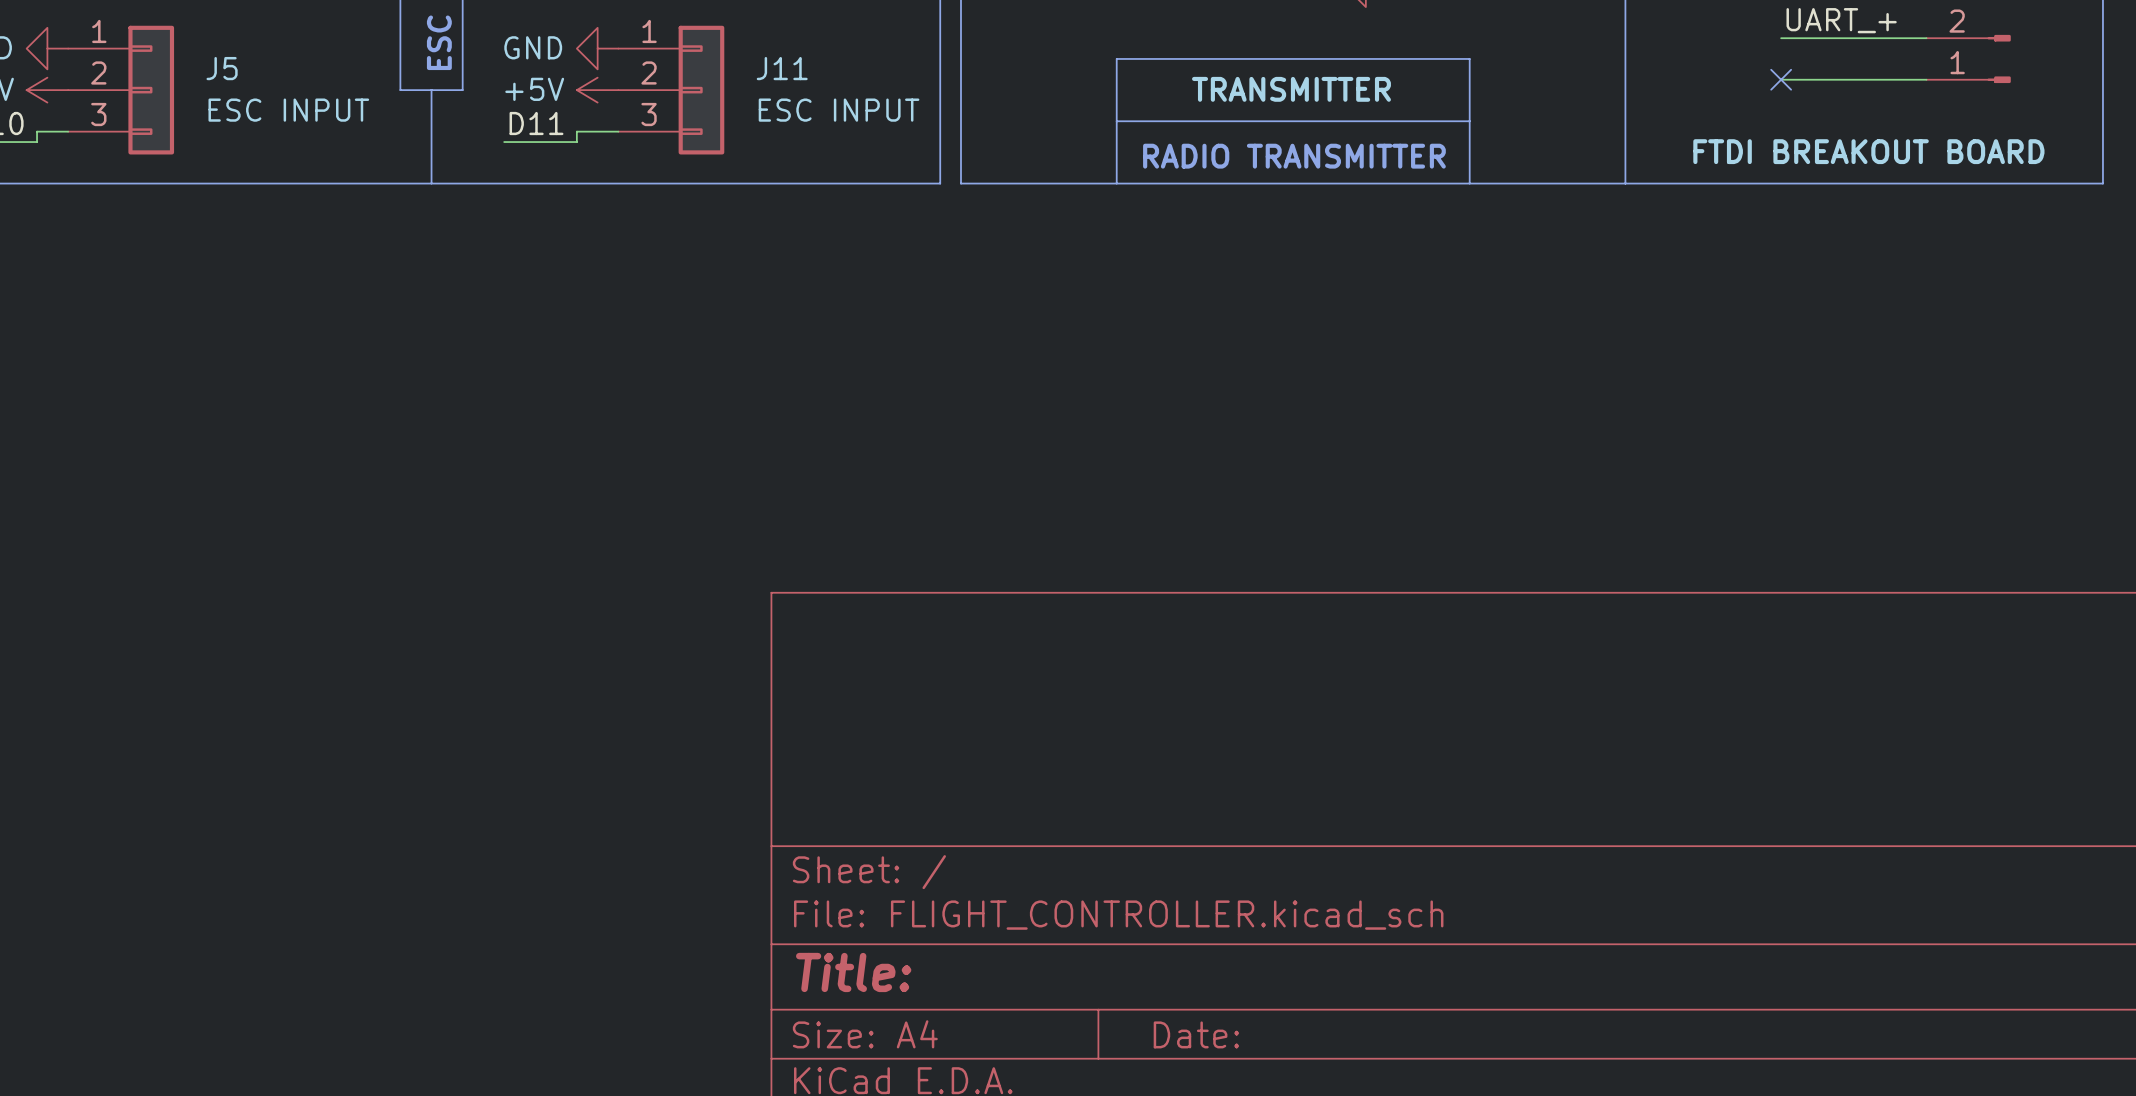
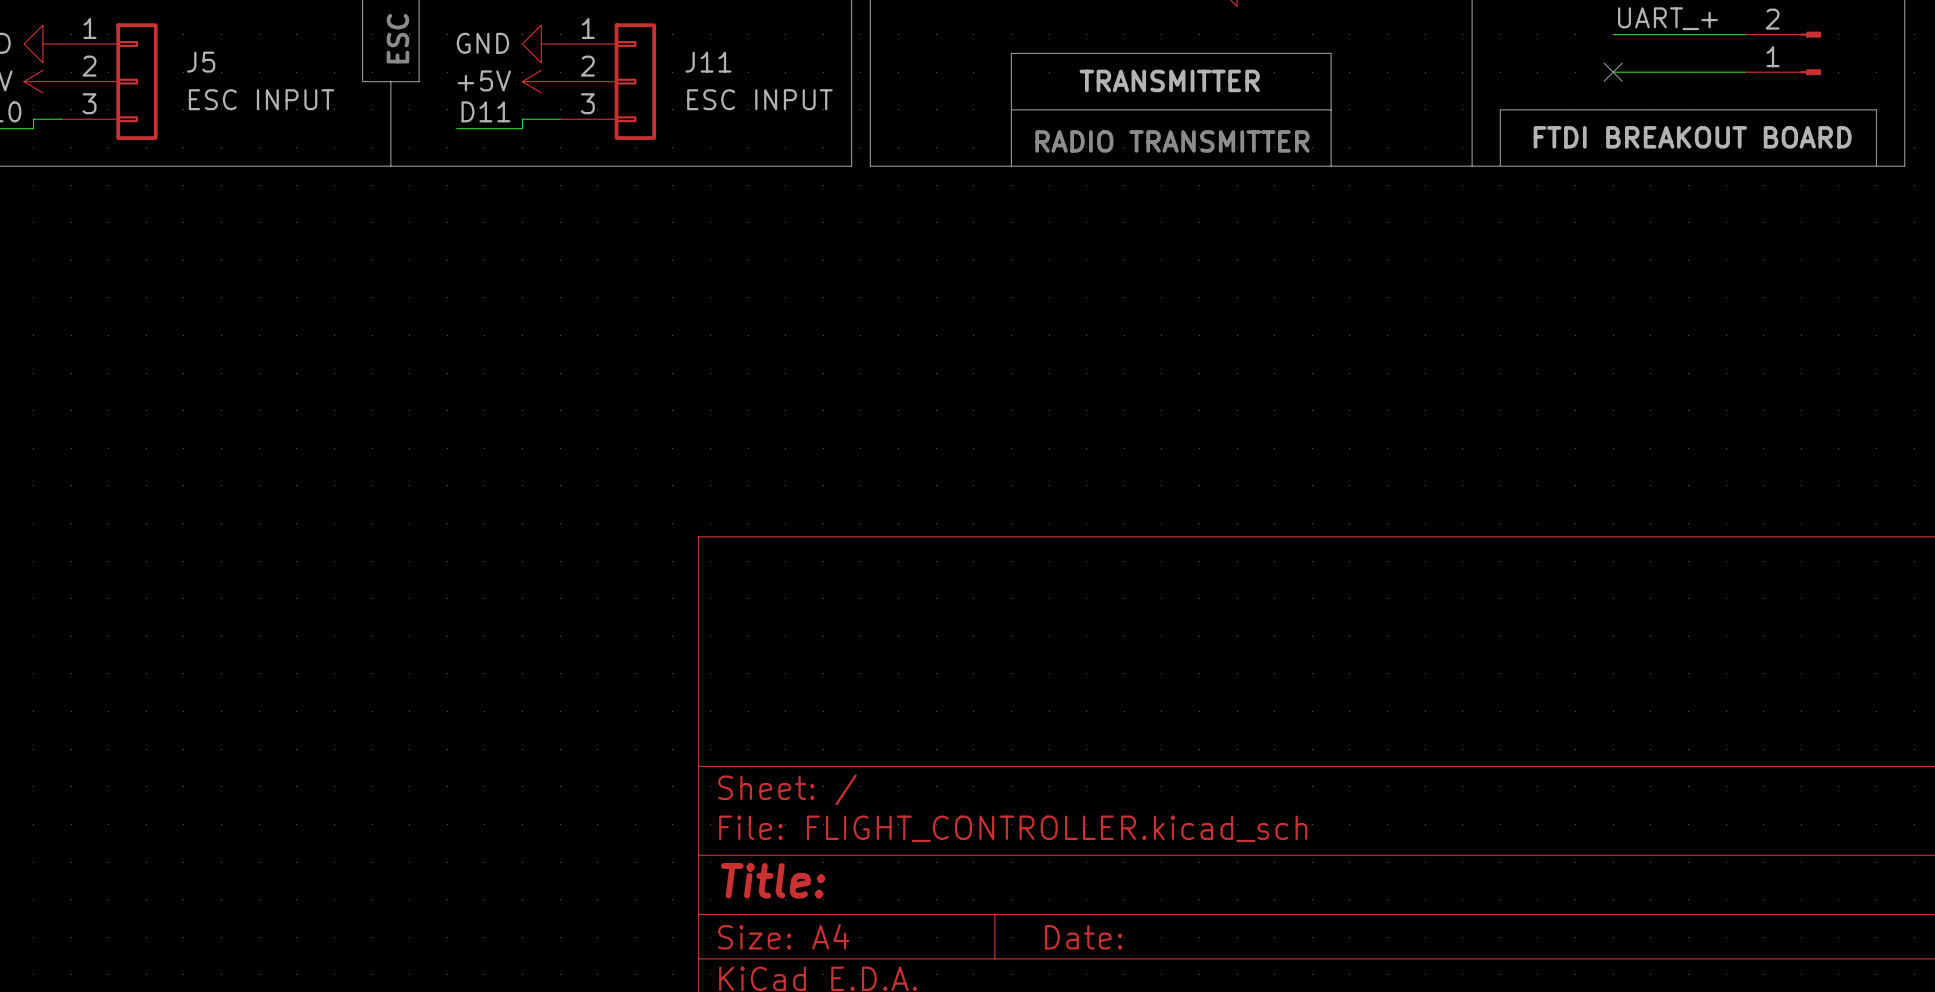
line: none -> (1500, 166) (1500, 109) (1876, 109) (1876, 166)

